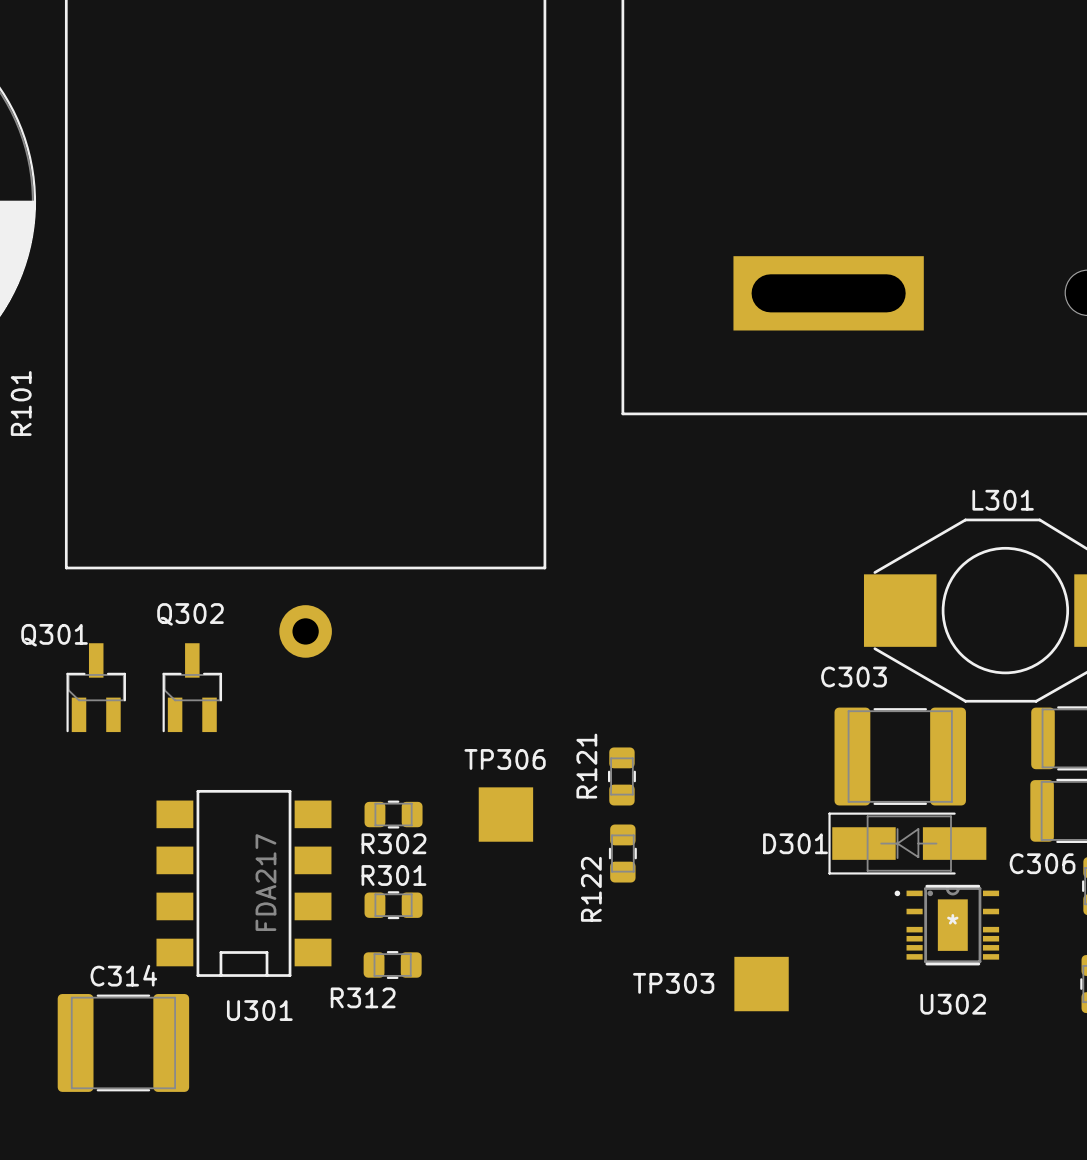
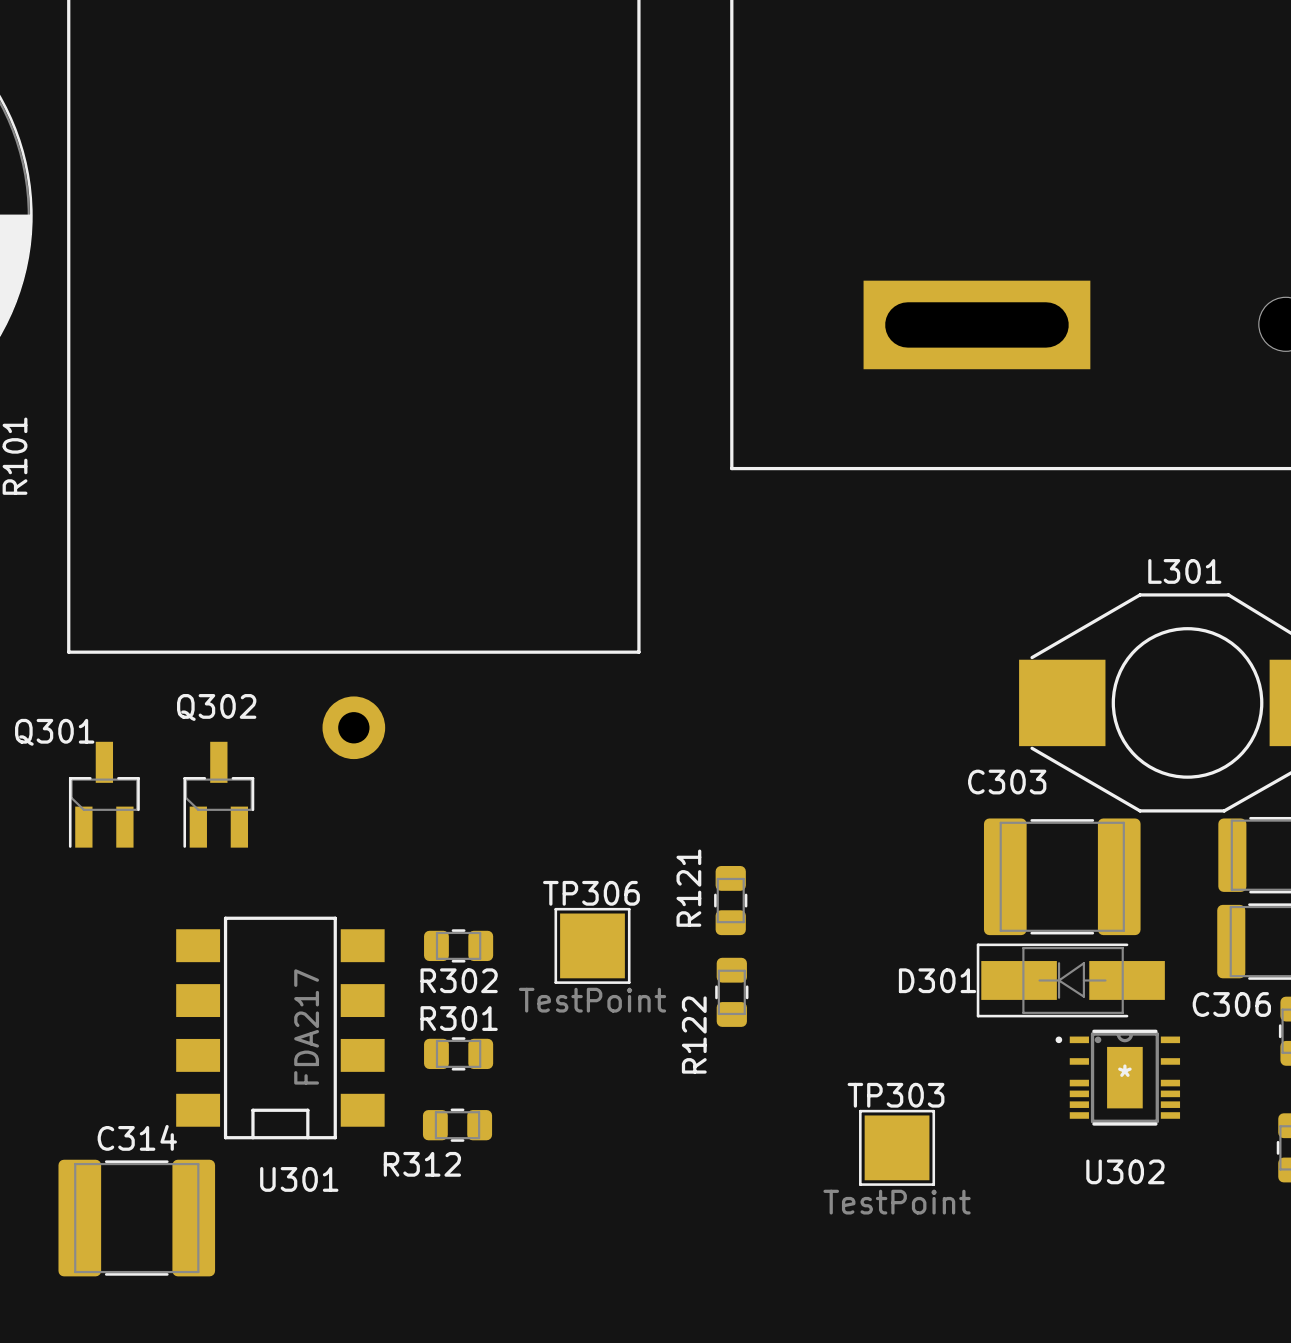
TP306 footprint: [478, 787, 534, 842] -> [554, 907, 631, 984]
TP306 value: none -> TestPoint (592, 1000)
TP303 footprint: [734, 956, 789, 1012] -> [859, 1109, 936, 1186]
TP303 name position: TP303 (673, 983) -> TP303 (896, 1095)
TP303 value: none -> TestPoint (897, 1202)

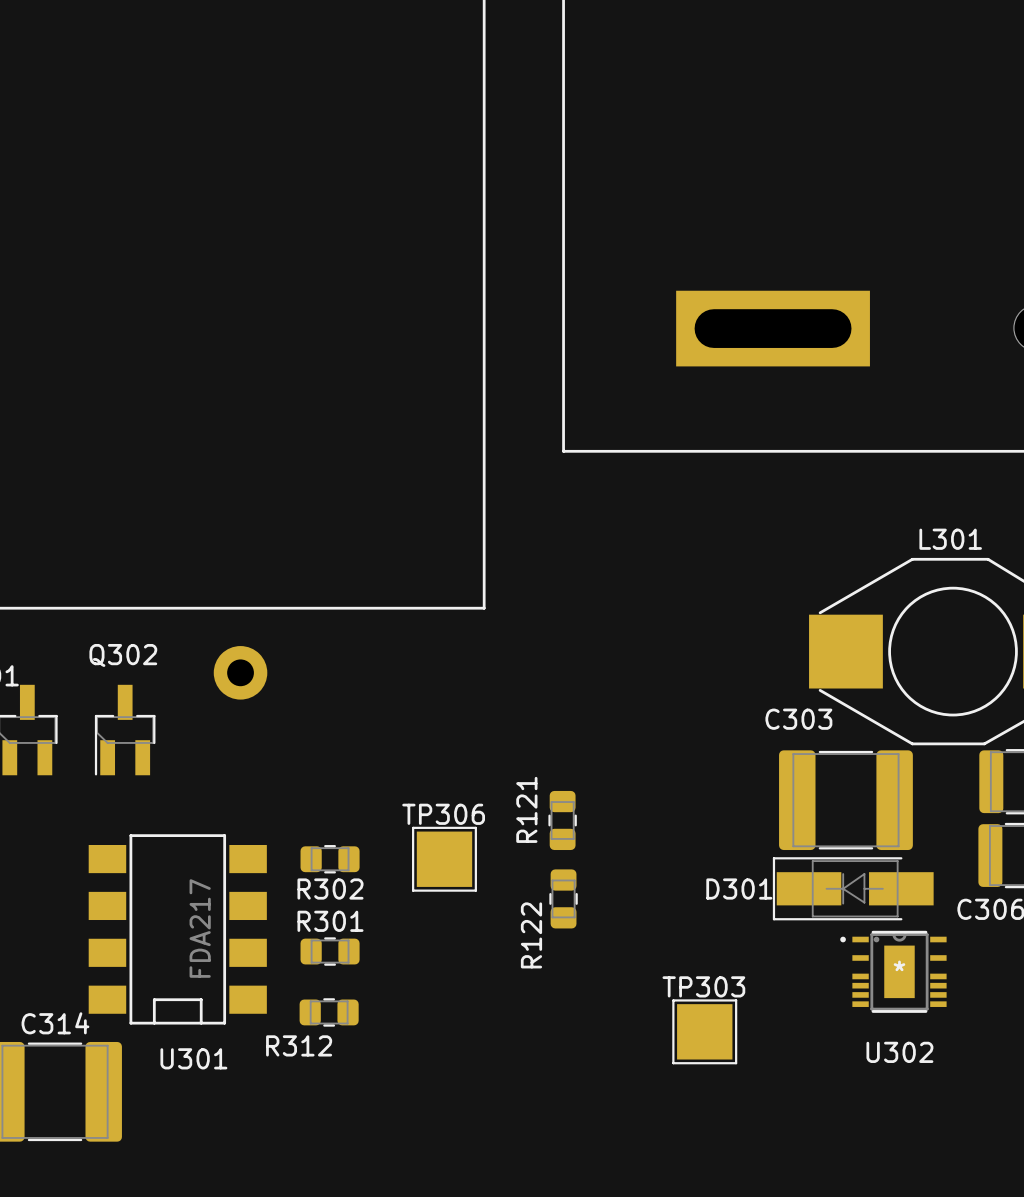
TP306 value: TestPoint (592, 1000) -> none
TP303 value: TestPoint (897, 1202) -> none

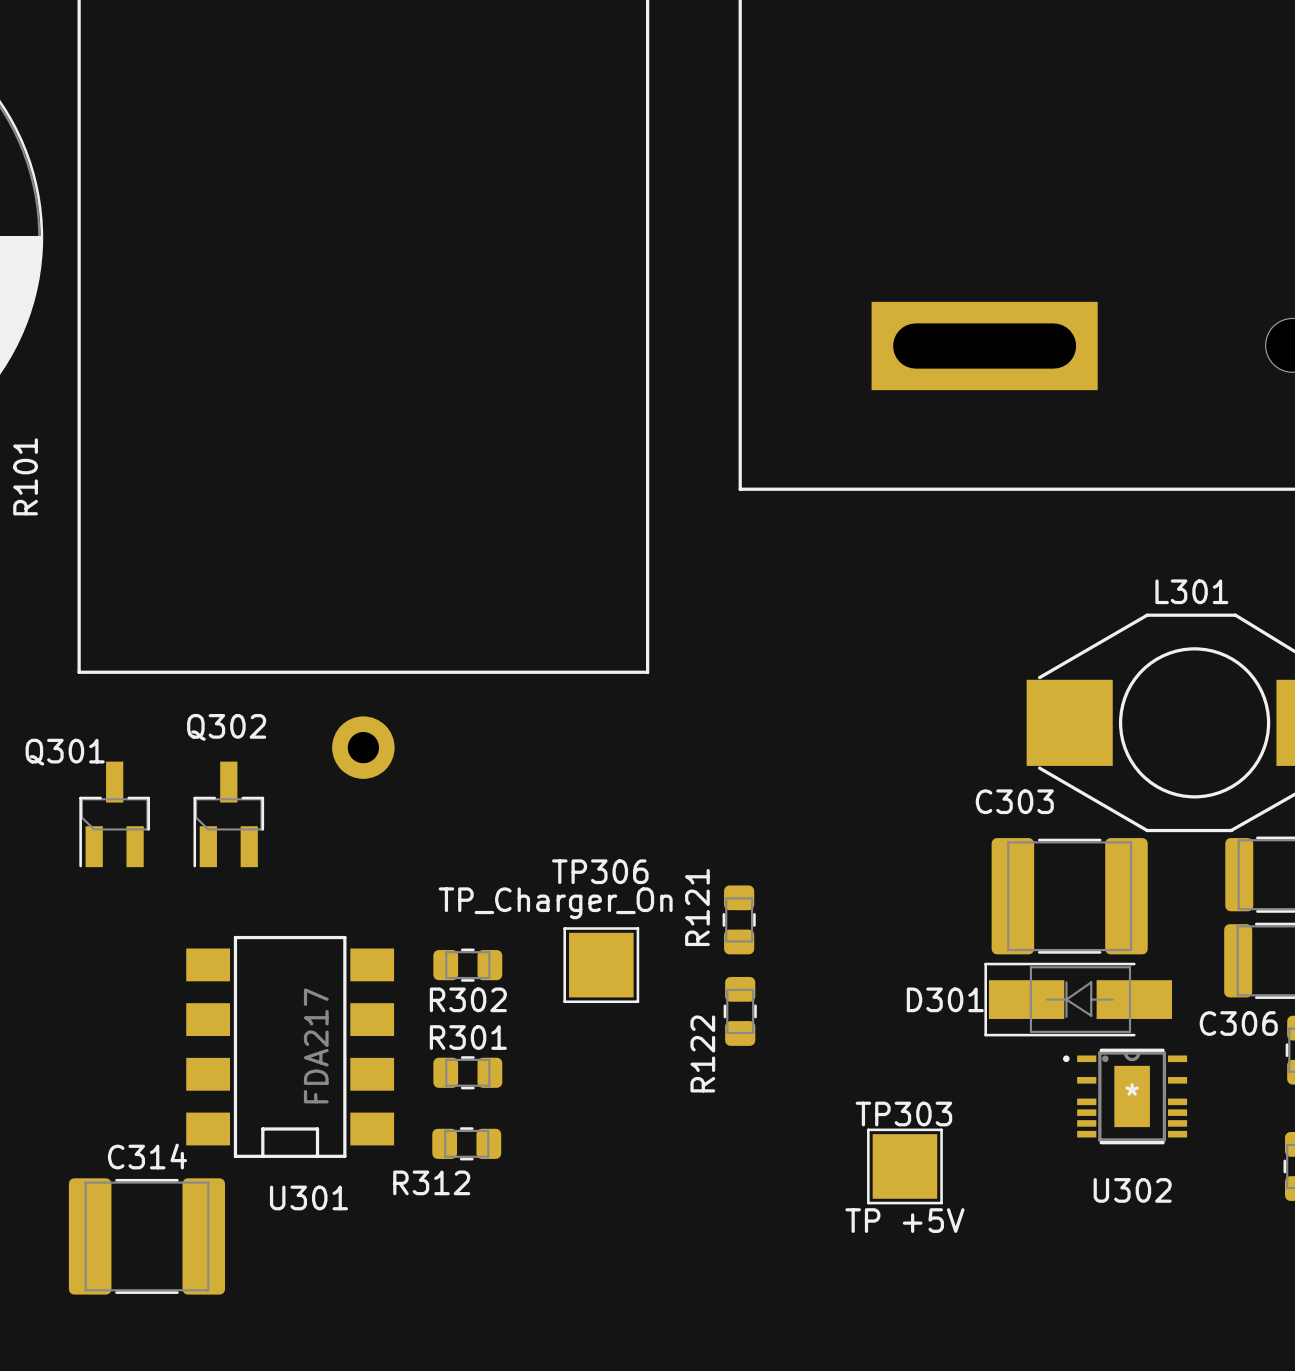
TP306 value: none -> TP_Charger_On (555, 903)
TP306 name position: TP306 (443, 814) -> TP306 (600, 871)
TP303 value: none -> TP +5V (904, 1220)

